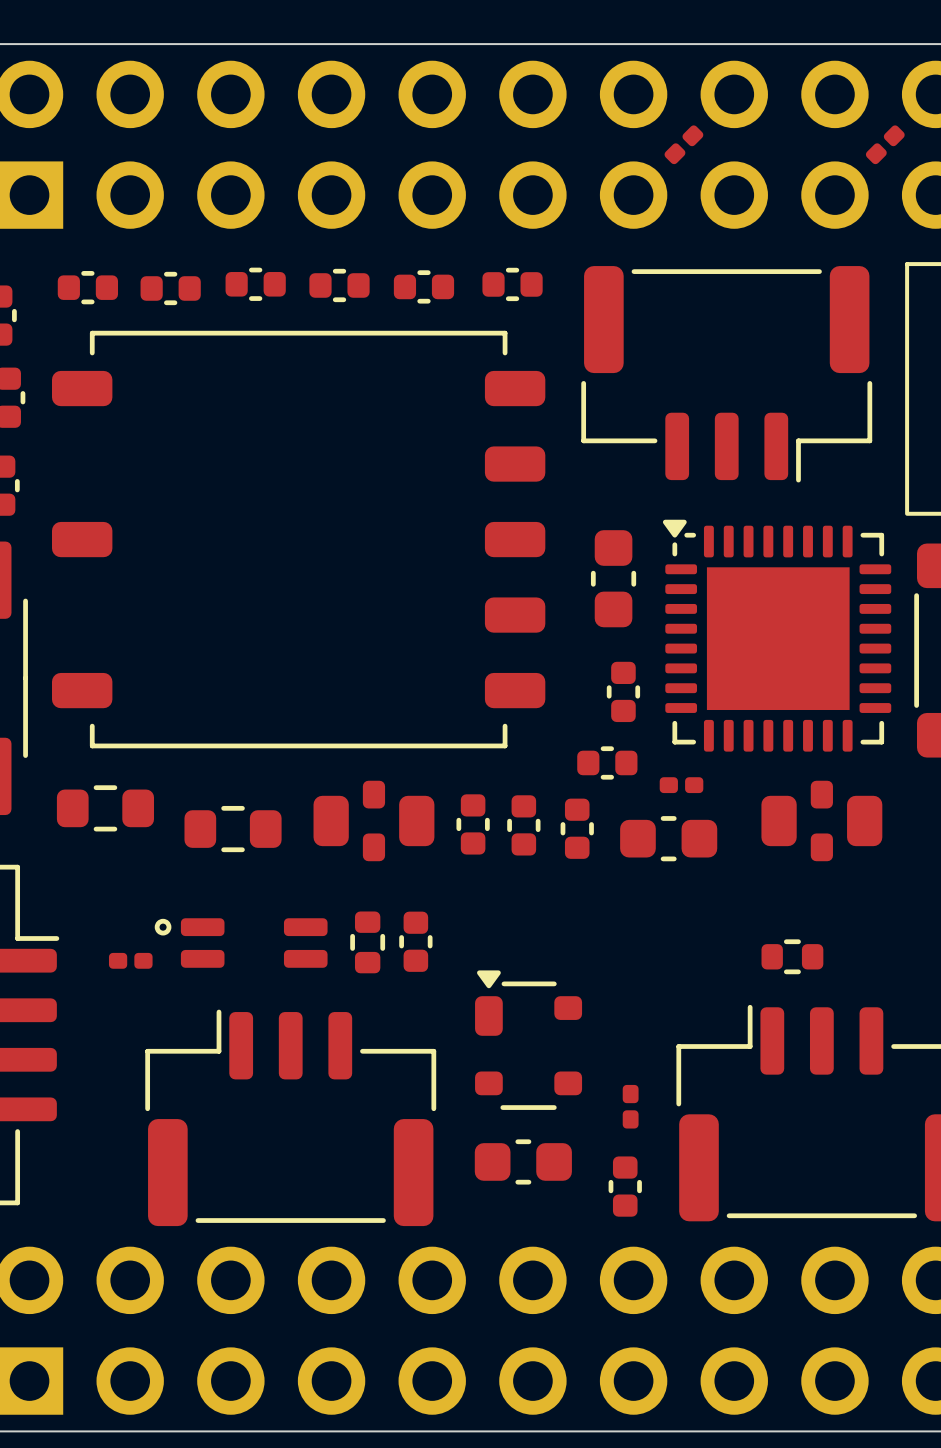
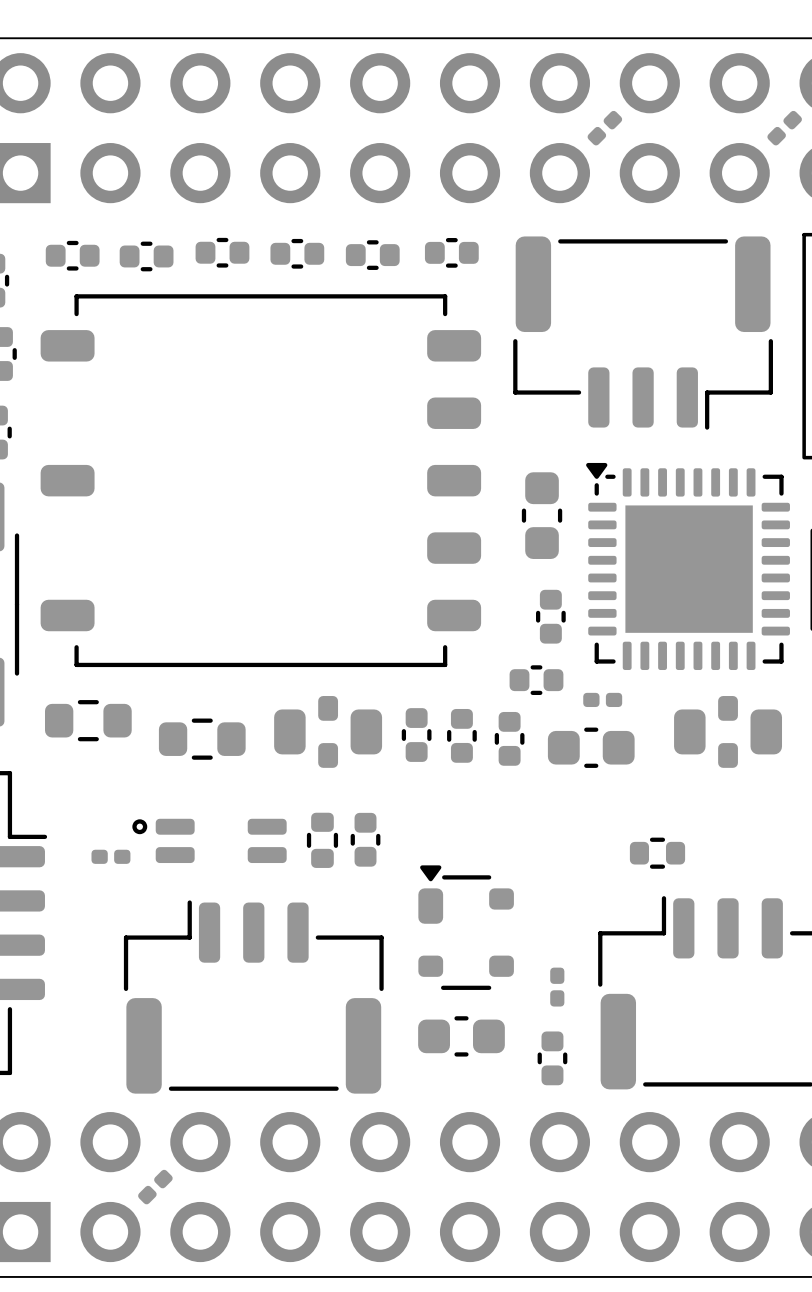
part position: (792, 956) -> (657, 853)
part: none -> (155, 1187)

